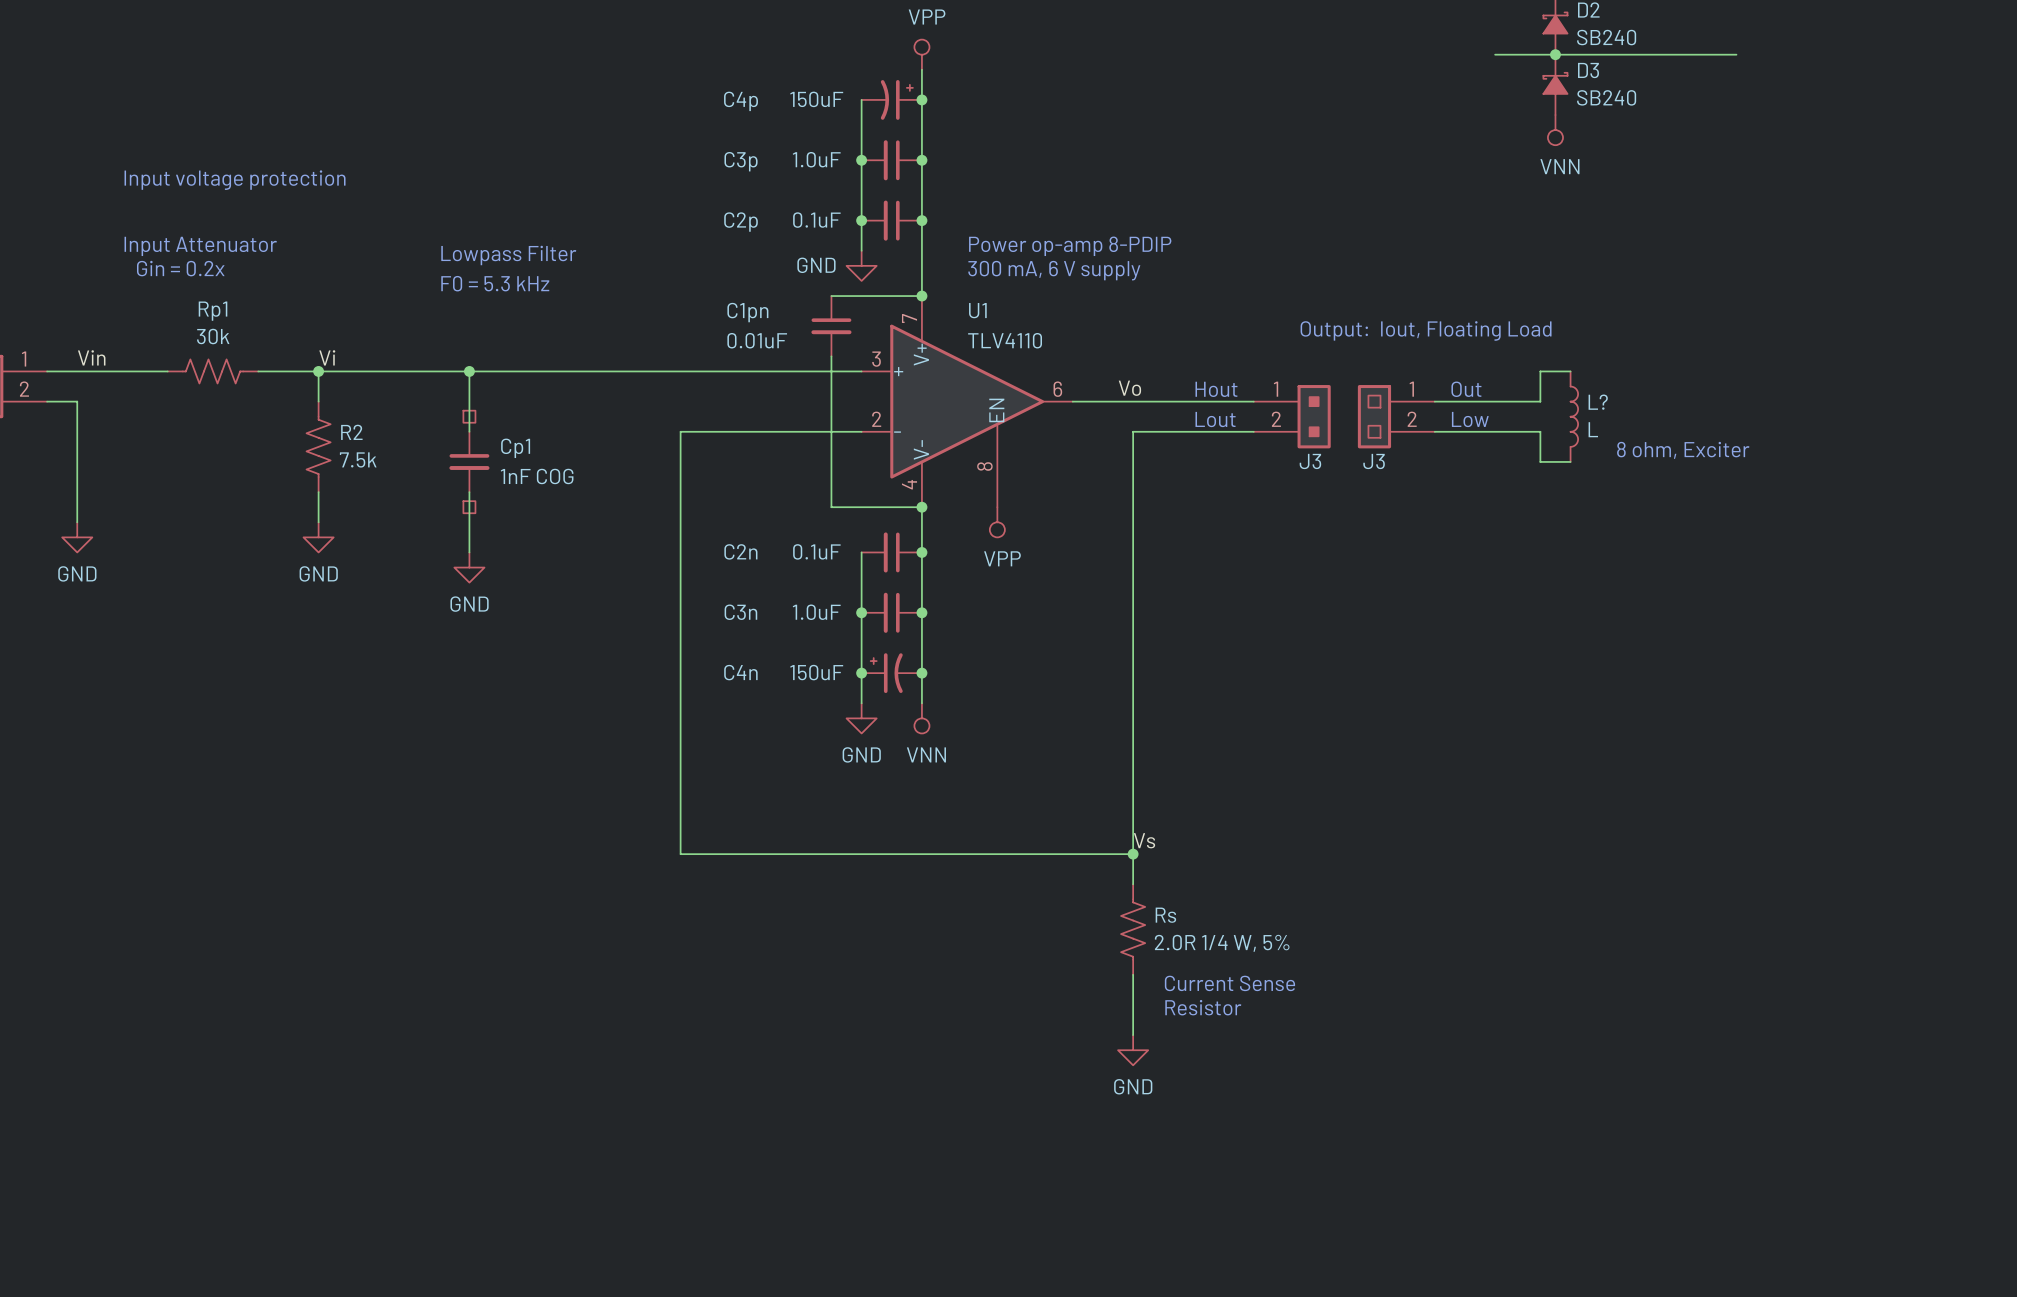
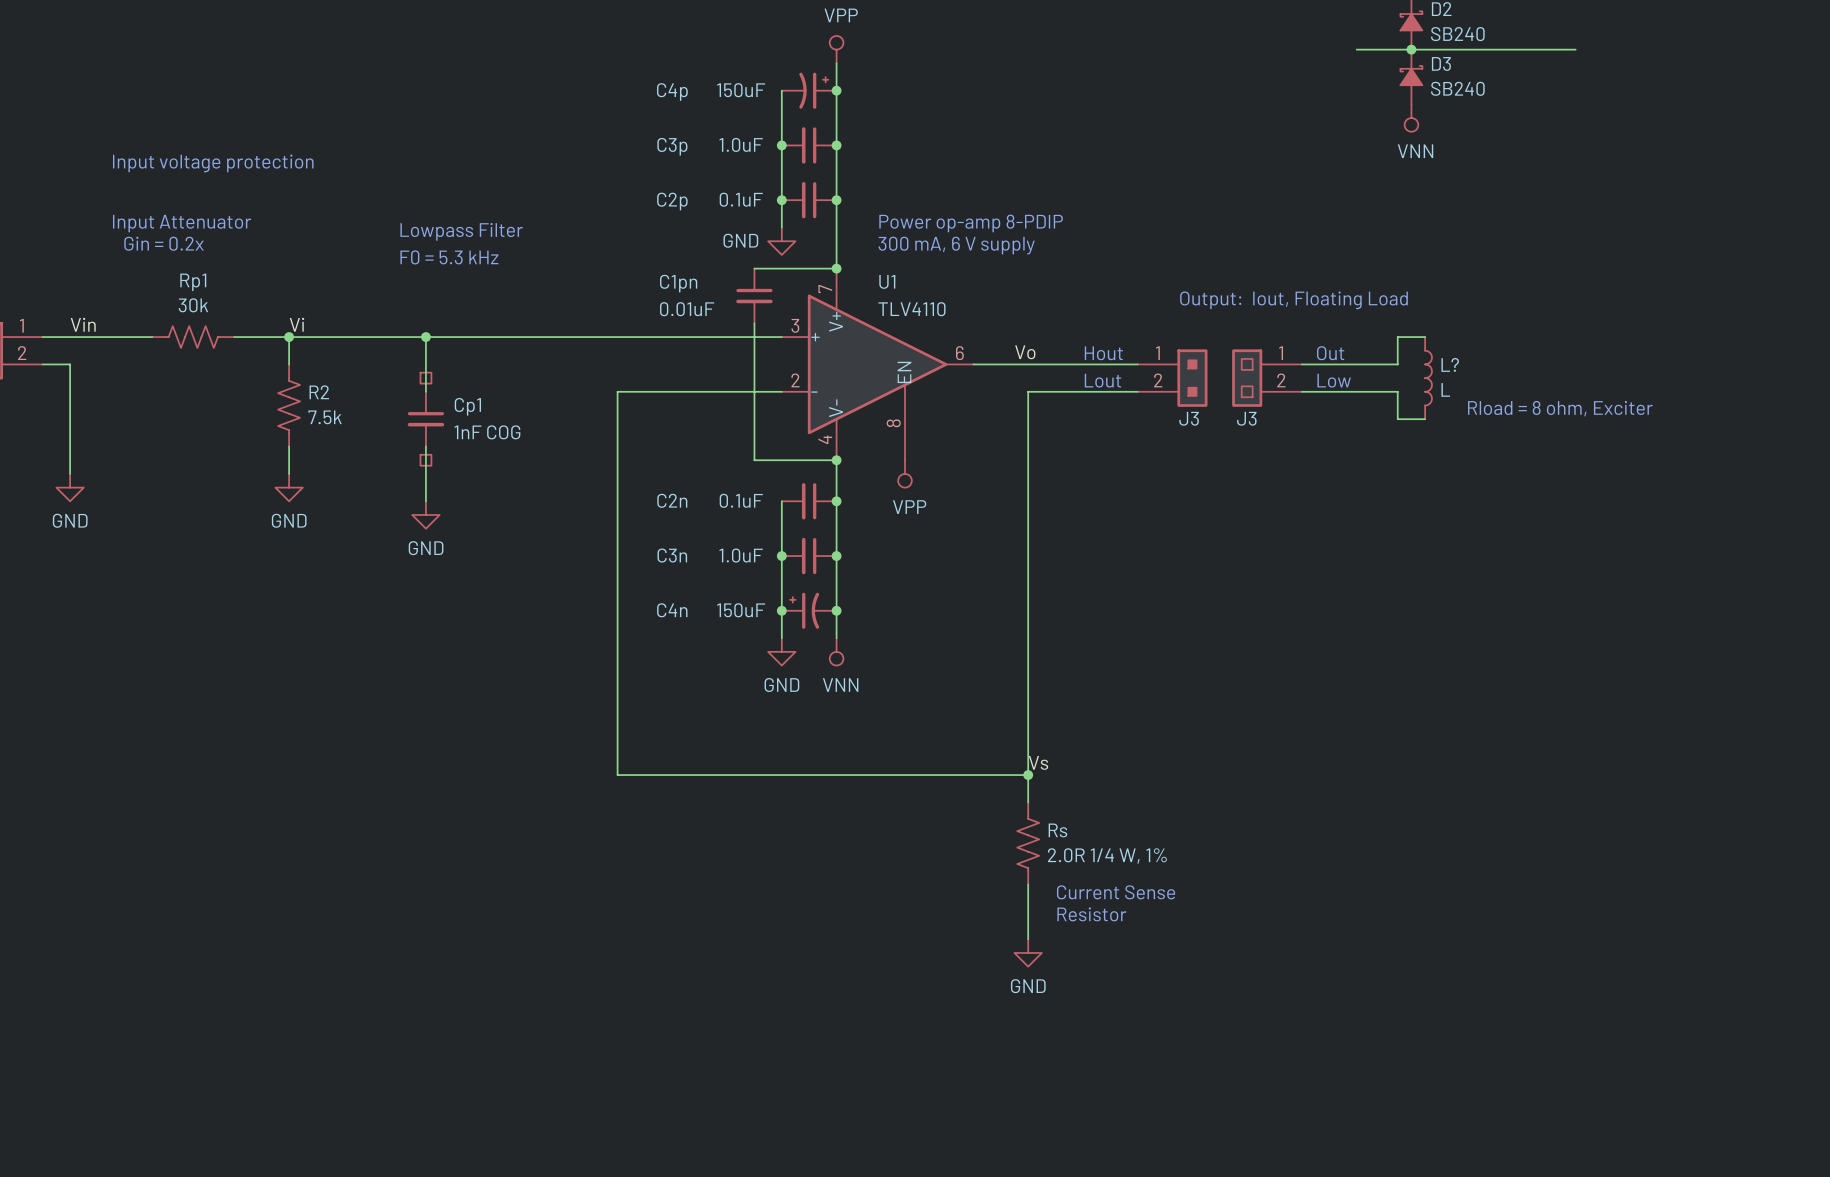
text: 8 ohm, Exciter (1683, 450) -> Rload = 8 ohm, Exciter (1560, 408)
Rs value: 2.0R 1/4 W, 5% (1222, 943) -> 2.0R 1/4 W, 1% (1107, 855)

